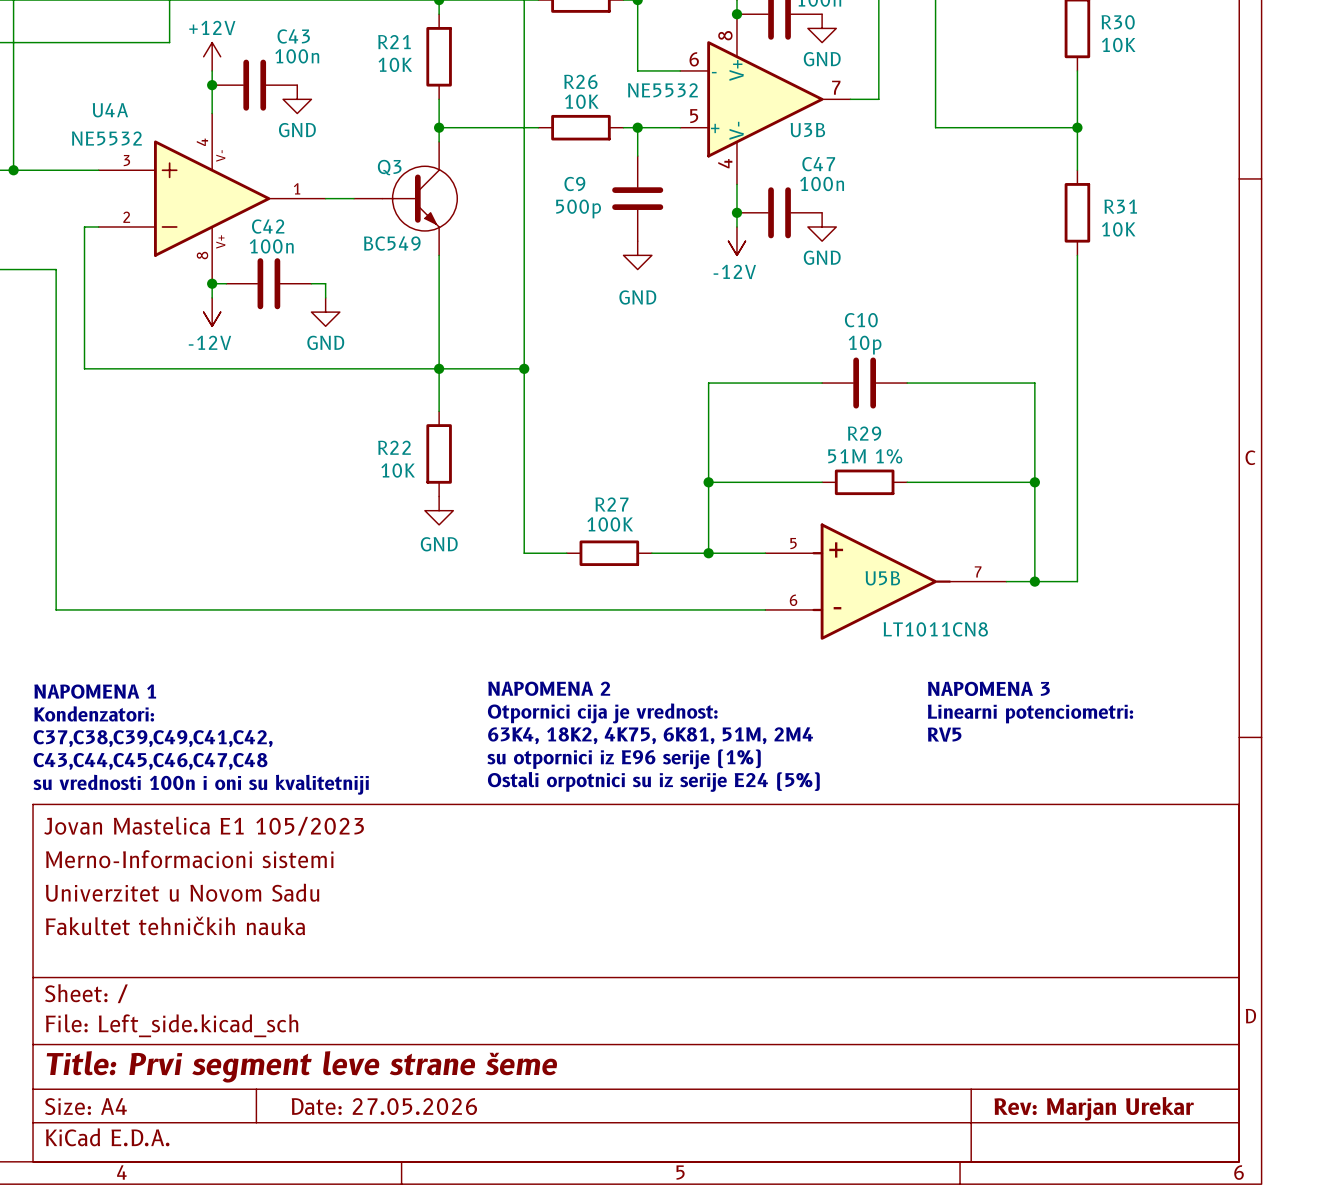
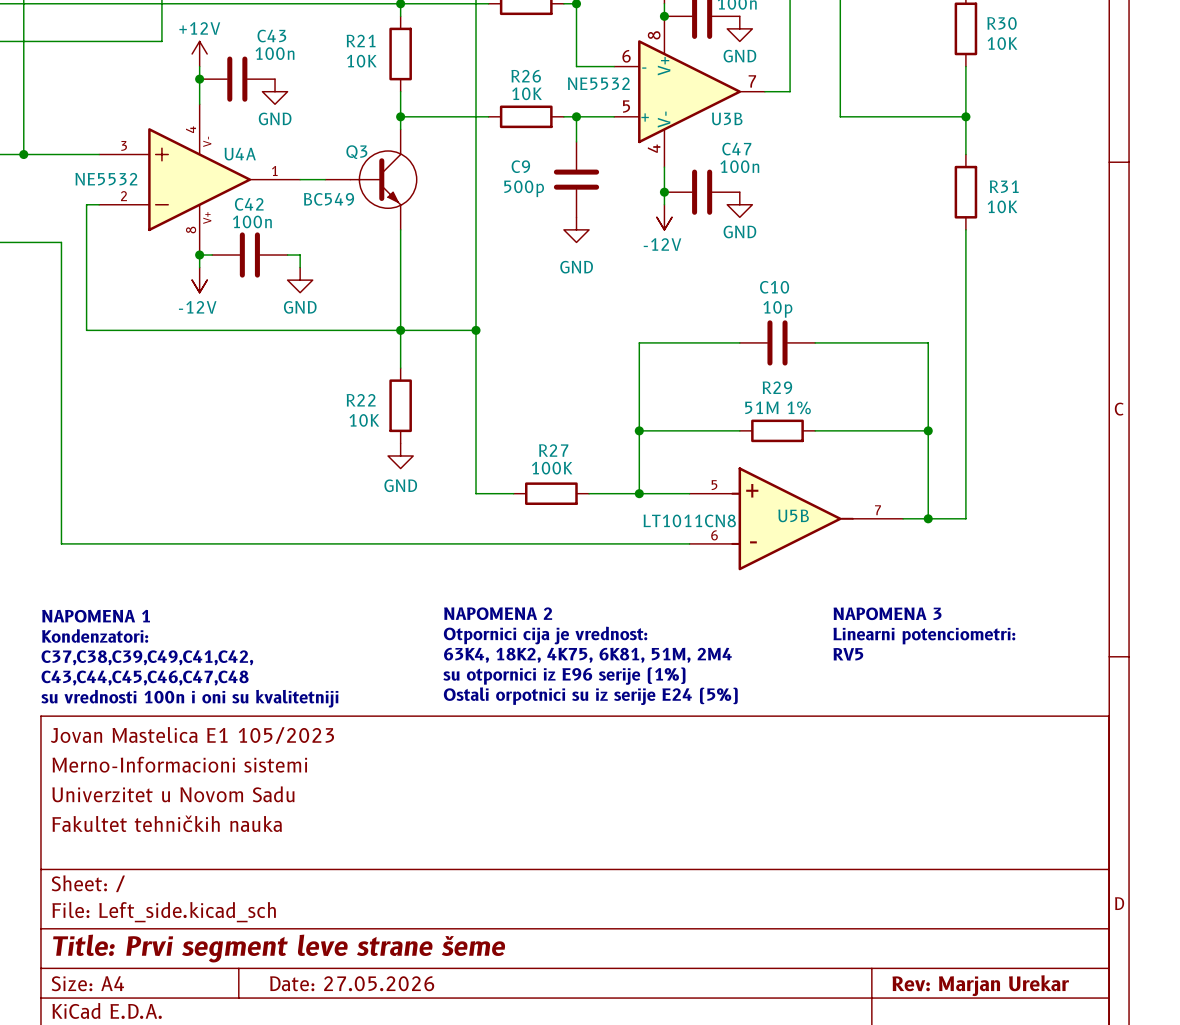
U4A name position: U4A (110, 110) -> U4A (240, 154)
U4A value position: NE5532 (106, 138) -> NE5532 (106, 179)
Q3 value position: BC549 (392, 243) -> BC549 (329, 199)
U5B value position: LT1011CN8 (935, 629) -> LT1011CN8 (689, 520)

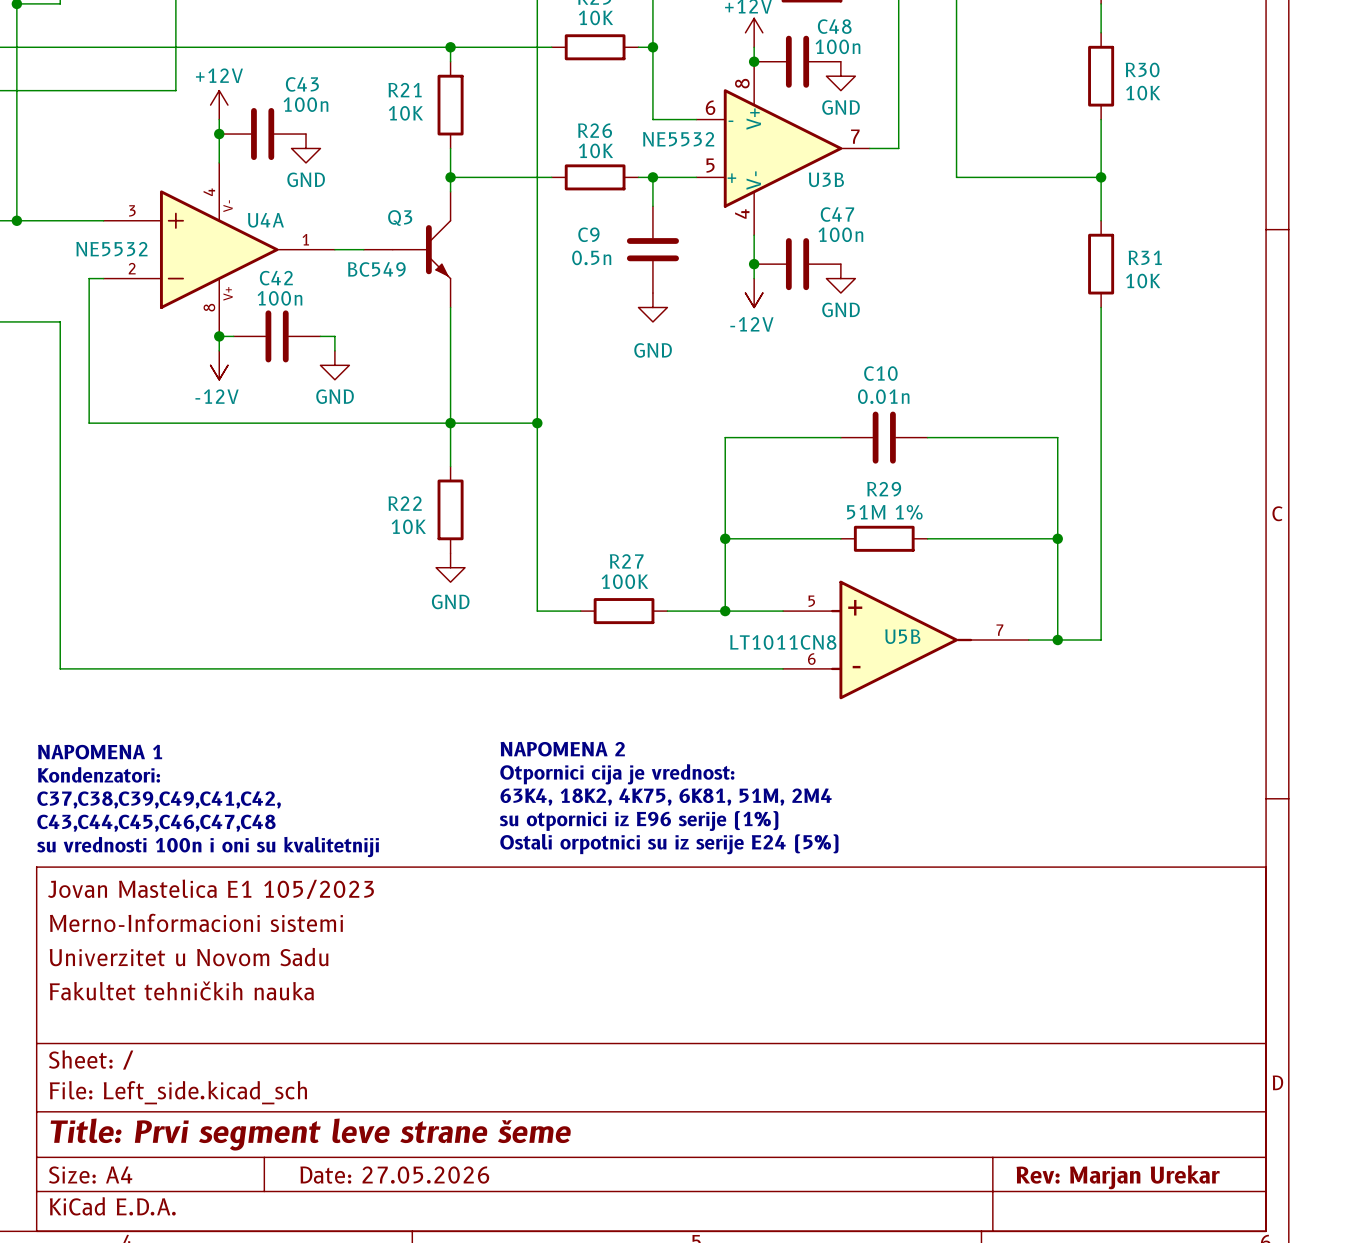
Q3 symbol: [325, 129, 417, 230] -> [363, 191, 451, 308]
C9 value: 500p (524, 188) -> 0.5n (591, 257)
C10 value: 10p (777, 309) -> 0.01n (883, 396)
text: NAPOMENA 3 (887, 613) -> none
text: Linearni potenciometri: (924, 636) -> none
text: RV5 (848, 654) -> none

